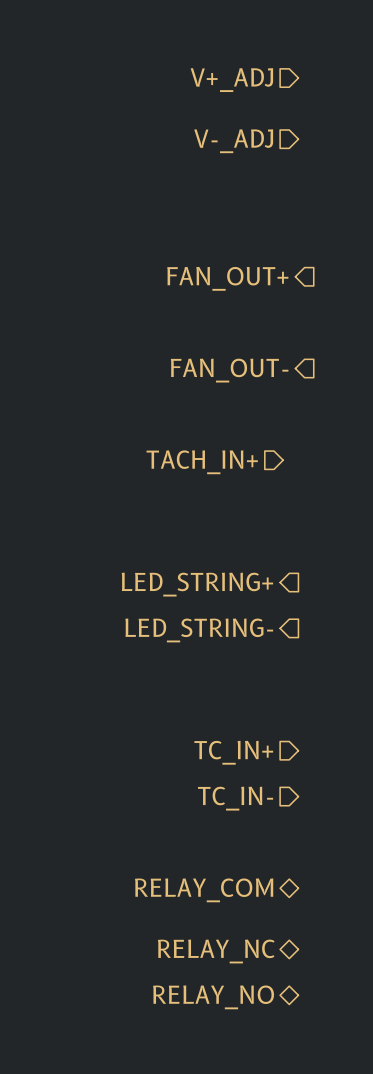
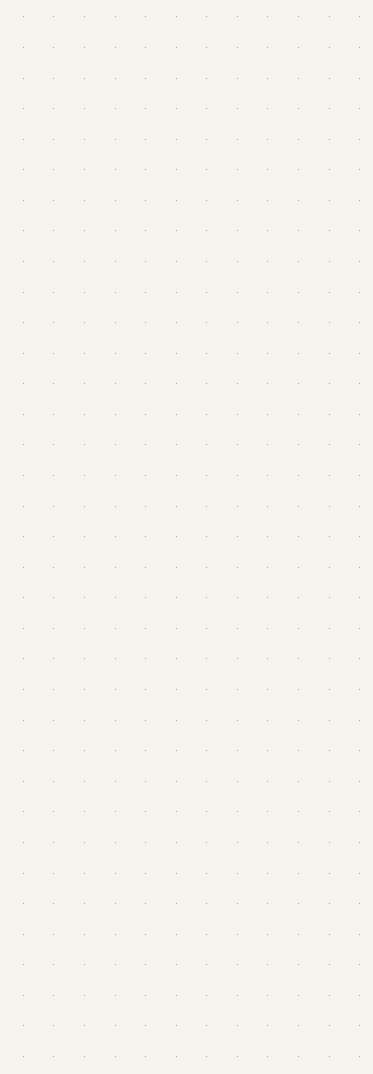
hierarchical label: V+_ADJ (231, 80) -> none
hierarchical label: V-_ADJ (233, 141) -> none
hierarchical label: FAN_OUT+ (227, 278) -> none
hierarchical label: FAN_OUT- (229, 370) -> none
hierarchical label: TACH_IN+ (202, 462) -> none
hierarchical label: LED_STRING+ (197, 584) -> none
hierarchical label: LED_STRING- (199, 630) -> none
hierarchical label: TC_IN+ (233, 752) -> none
hierarchical label: TC_IN- (235, 798) -> none
hierarchical label: RELAY_COM (204, 890) -> none
hierarchical label: RELAY_NC (216, 951) -> none
hierarchical label: RELAY_NO (213, 997) -> none

